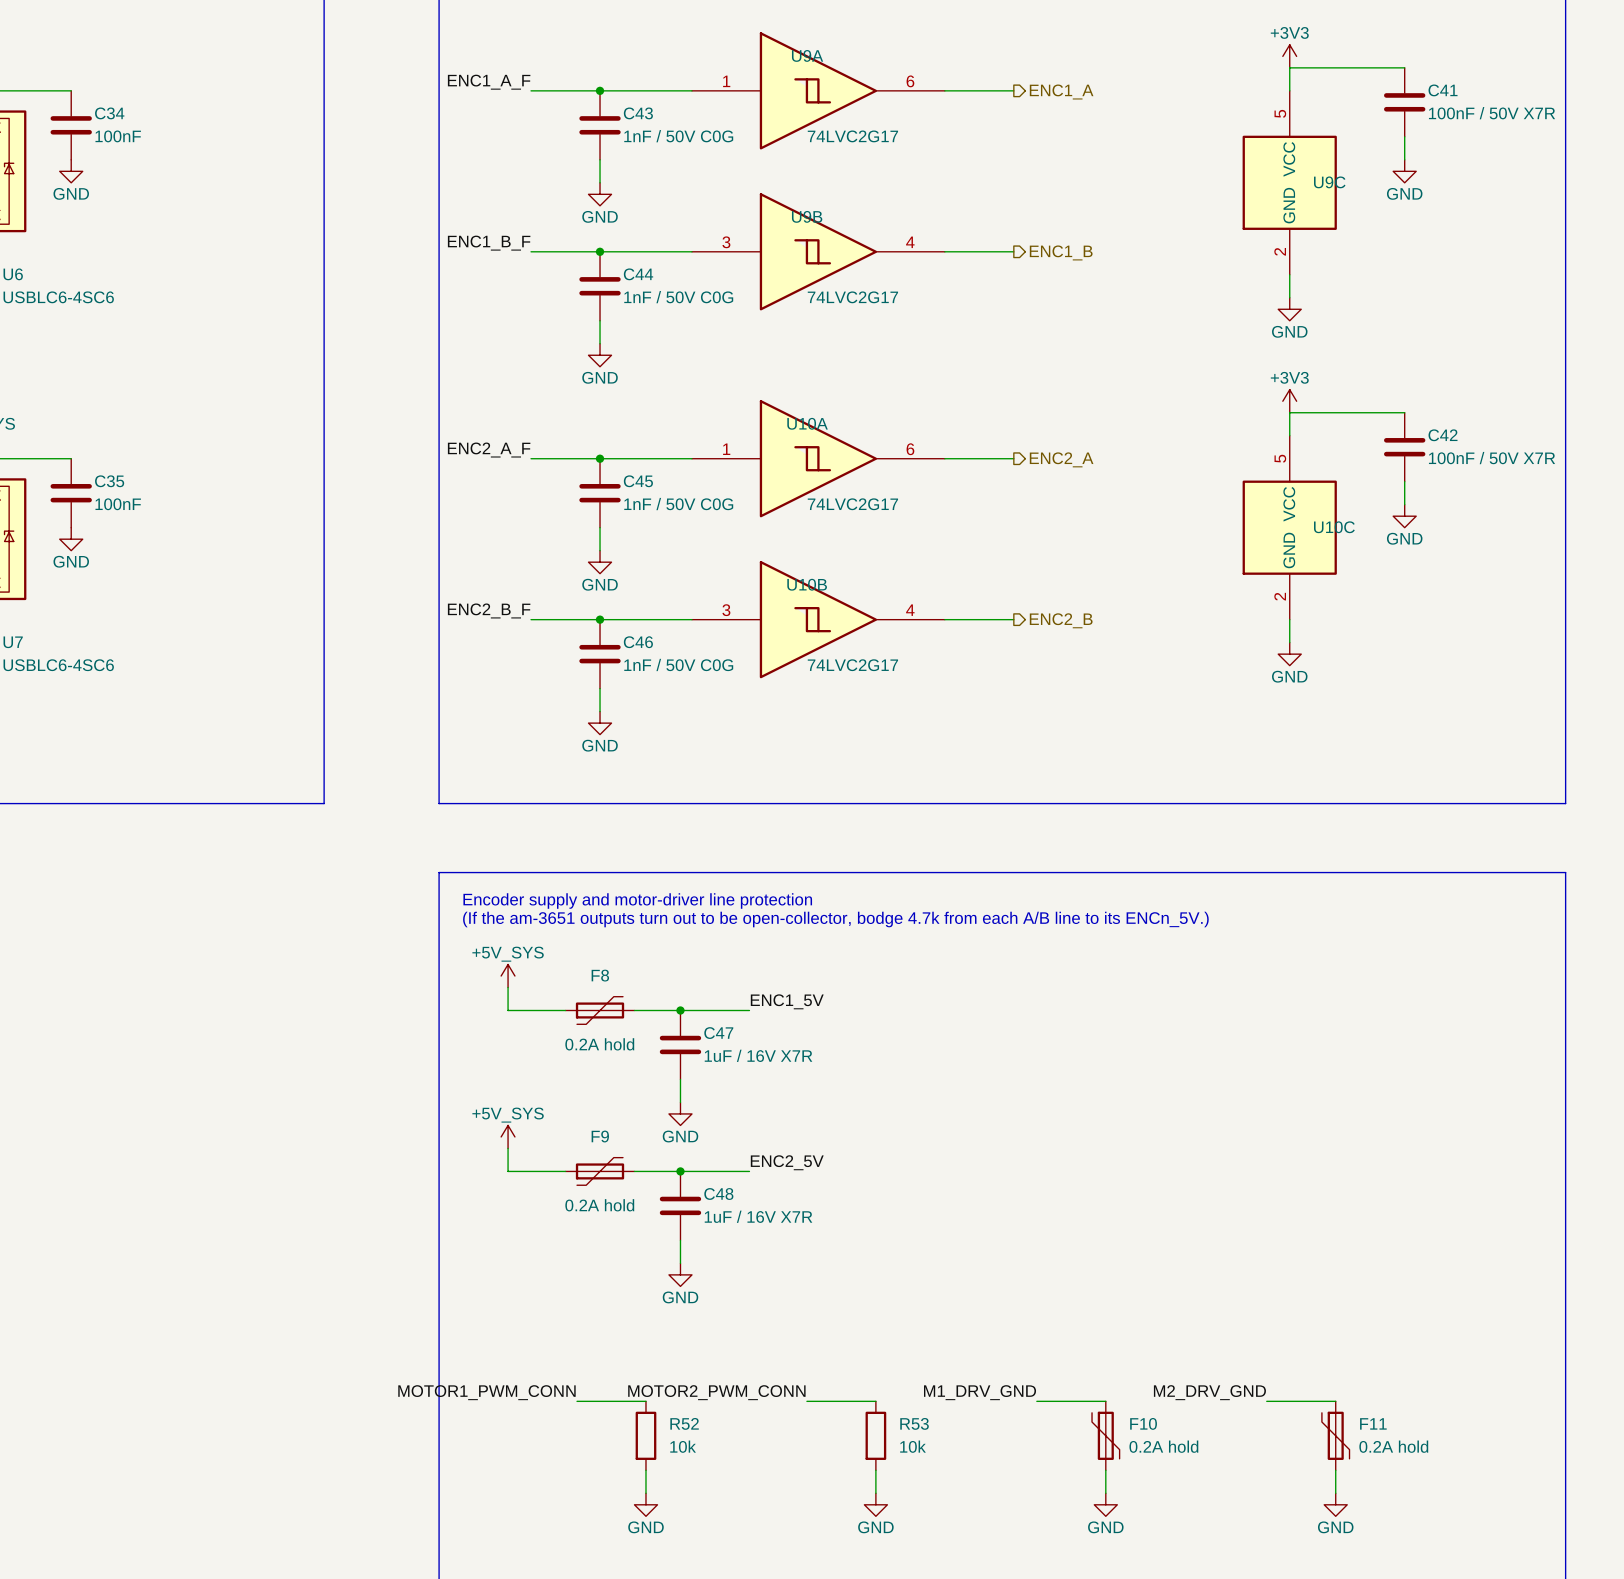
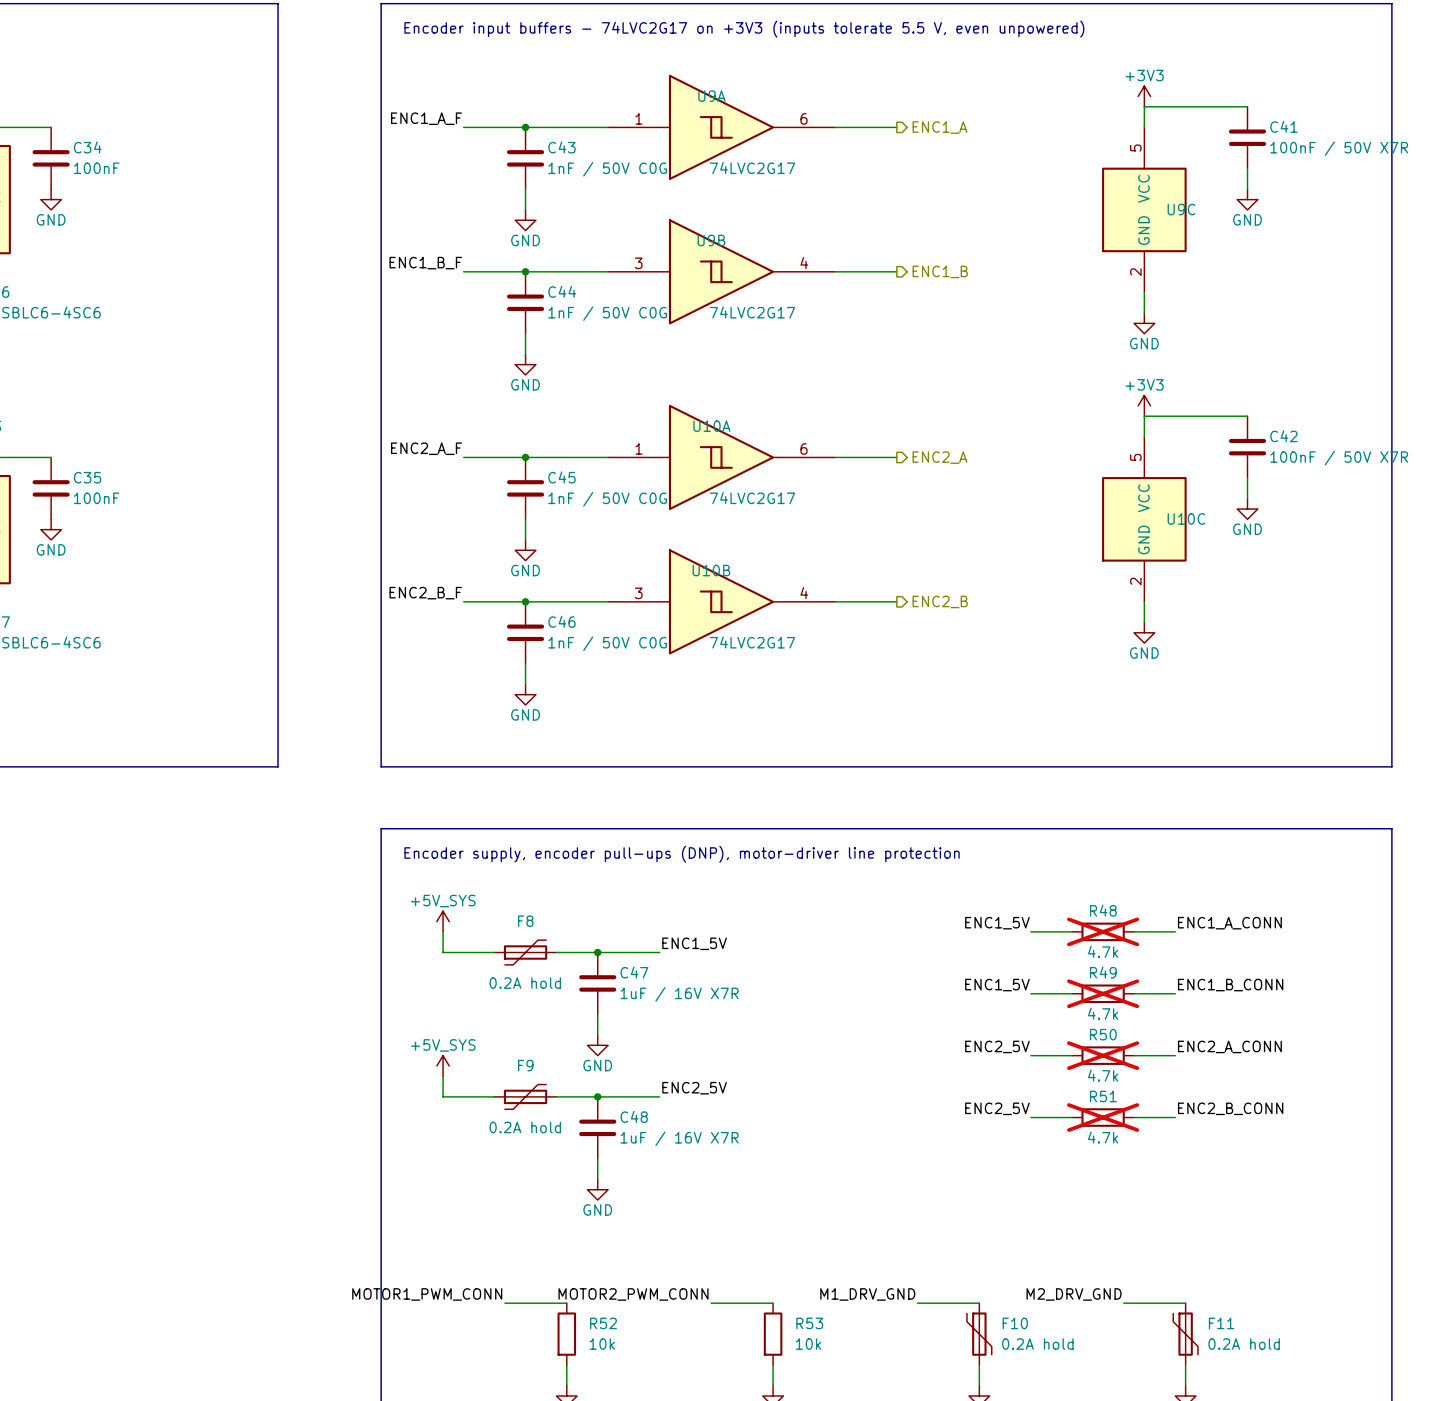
text: Encoder supply and motor-driver line protection (637, 901) -> Encoder supply, encoder pull-ups (DNP), motor-driver line protection (682, 854)
text: (If the am-3651 outputs turn out to be open-collector, bodge 4.7k from each A/B line to its ENCn_5V.) (835, 919) -> none
label: none -> ENC1_5V (997, 923)
label: none -> ENC1_A_CONN (1229, 923)
wire: none -> (1030, 931) (1072, 931)
R48: none -> 4.7k (1103, 931)
wire: none -> (1134, 931) (1175, 931)
label: none -> ENC1_5V (997, 985)
label: none -> ENC1_B_CONN (1230, 985)
wire: none -> (1030, 993) (1072, 993)
R49: none -> 4.7k (1103, 993)
wire: none -> (1134, 993) (1175, 993)
label: none -> ENC2_5V (997, 1046)
label: none -> ENC2_A_CONN (1229, 1046)
wire: none -> (1030, 1055) (1072, 1055)
R50: none -> 4.7k (1103, 1055)
wire: none -> (1134, 1055) (1175, 1055)
label: none -> ENC2_5V (997, 1108)
label: none -> ENC2_B_CONN (1230, 1108)
wire: none -> (1030, 1117) (1072, 1117)
R51: none -> 4.7k (1103, 1117)
wire: none -> (1134, 1117) (1175, 1117)

